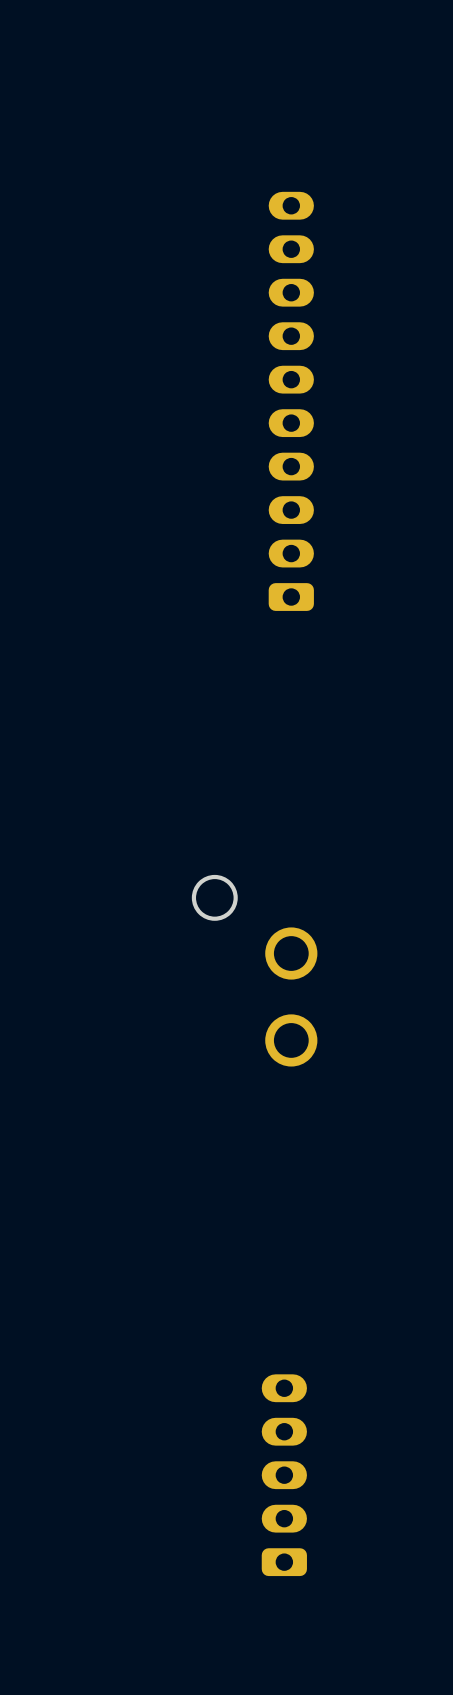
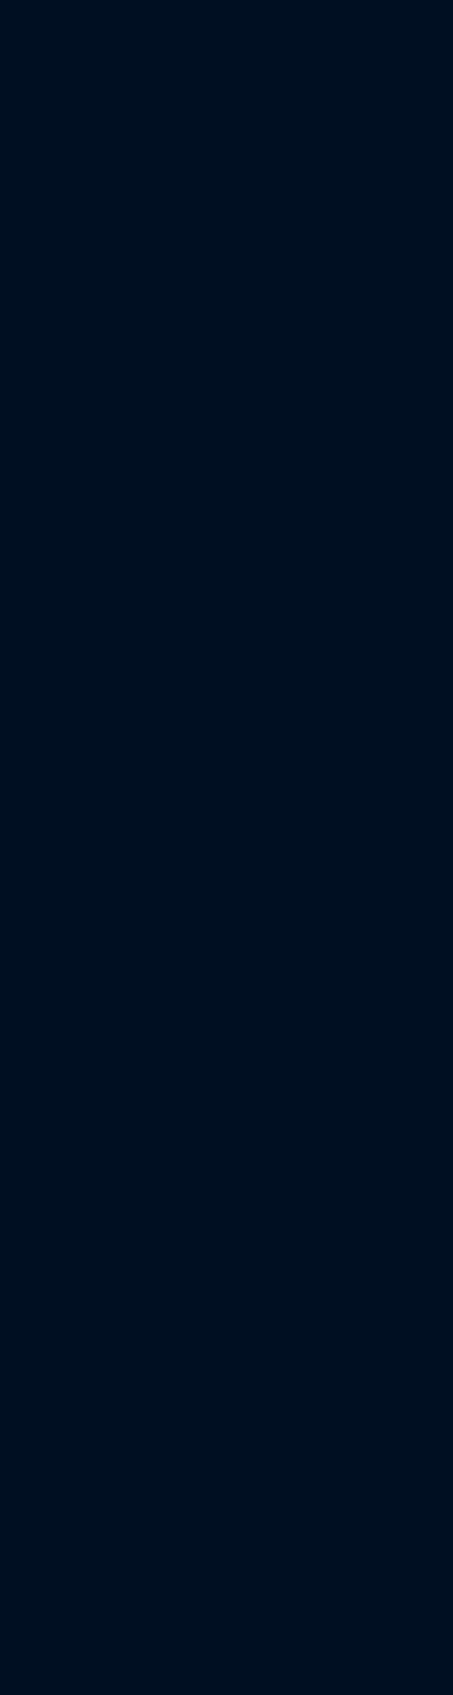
part: (291, 401) -> none
part: (254, 970) -> none
part: (284, 1475) -> none

